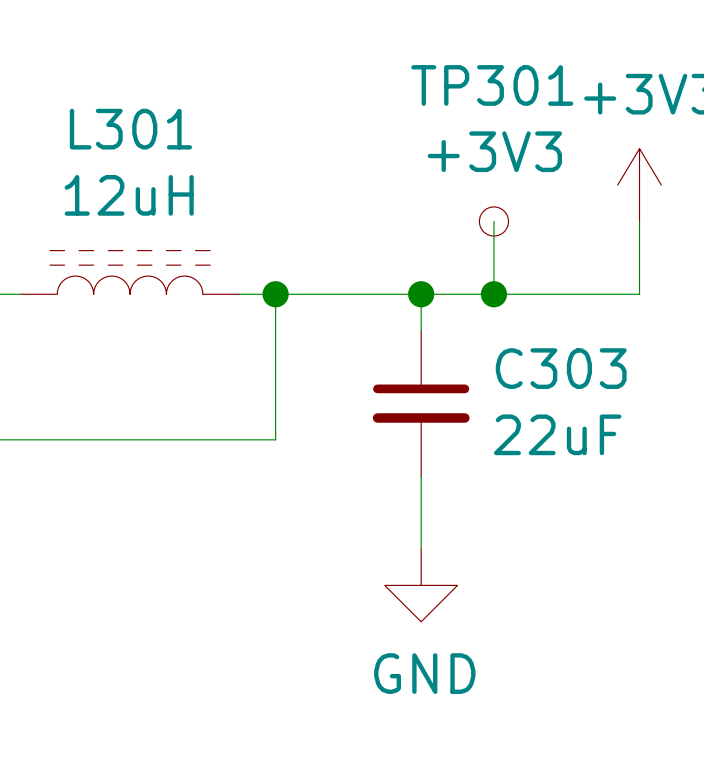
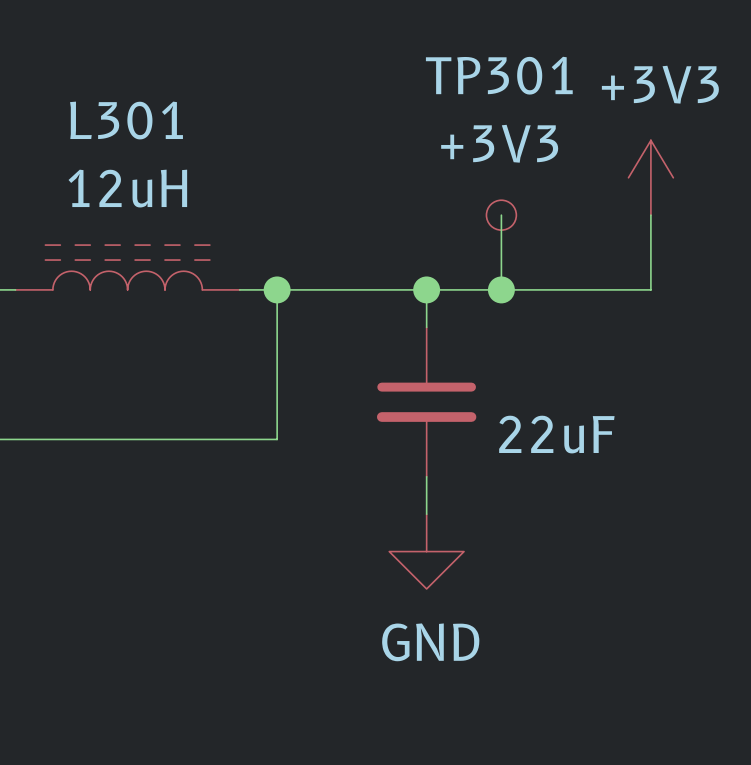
C303 name: C303 (561, 368) -> none
power symbol position: GND (421, 585) -> GND (426, 551)

